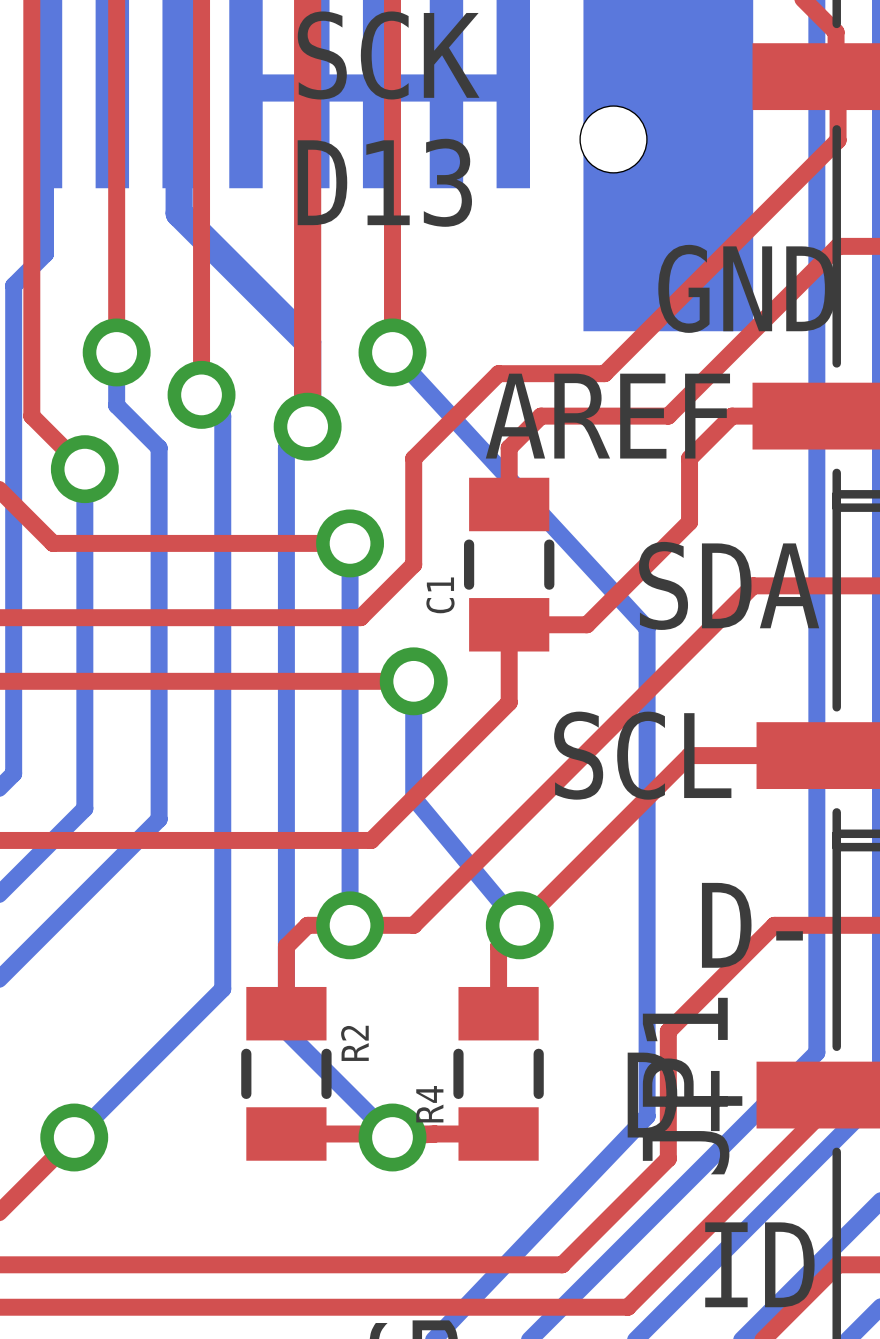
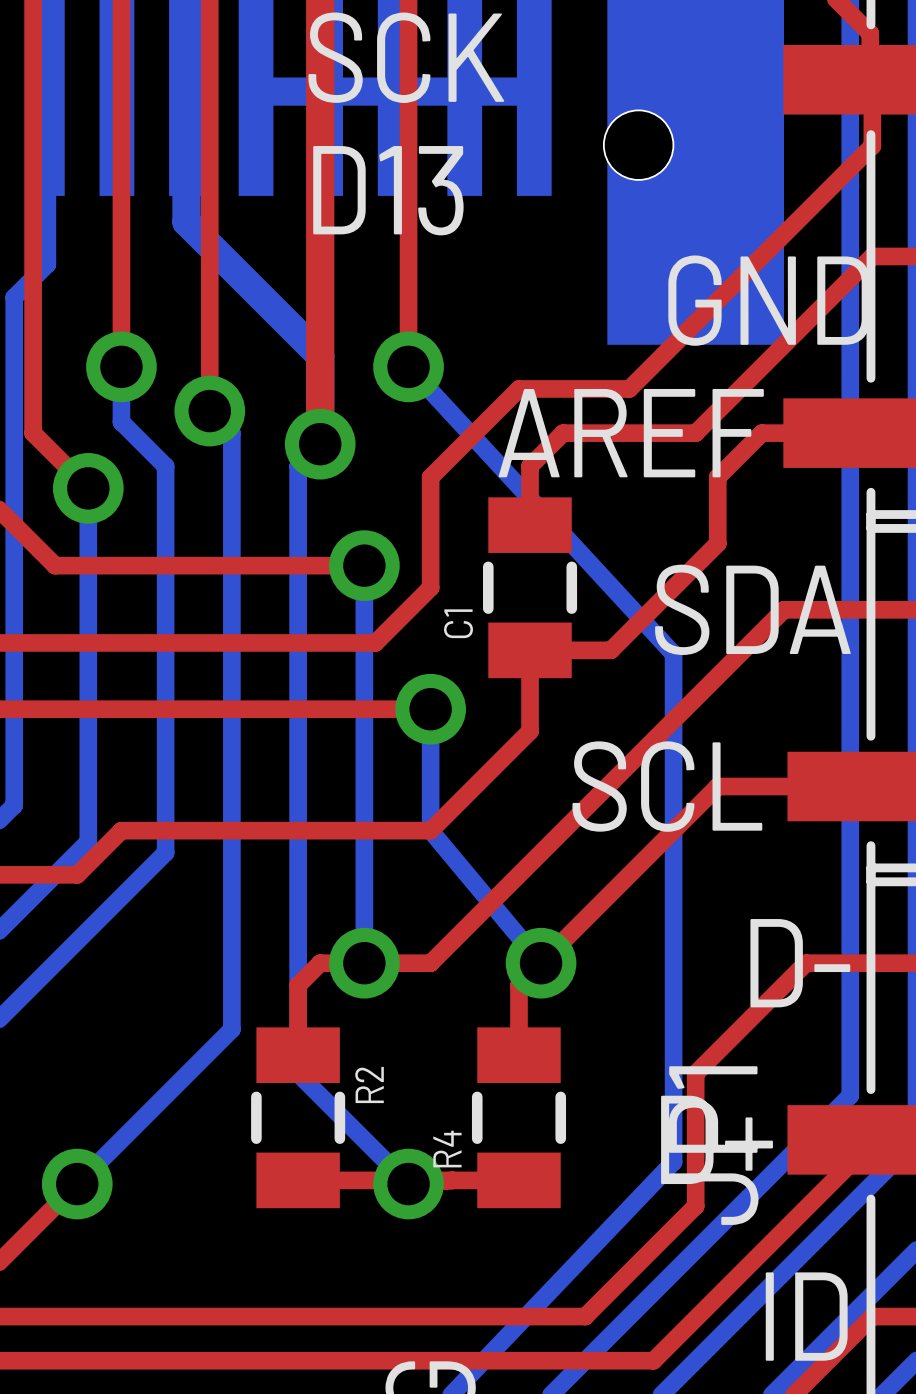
top track: (413, 798) (371, 840) (74, 840) -> (430, 830) (121, 830) (77, 874)

